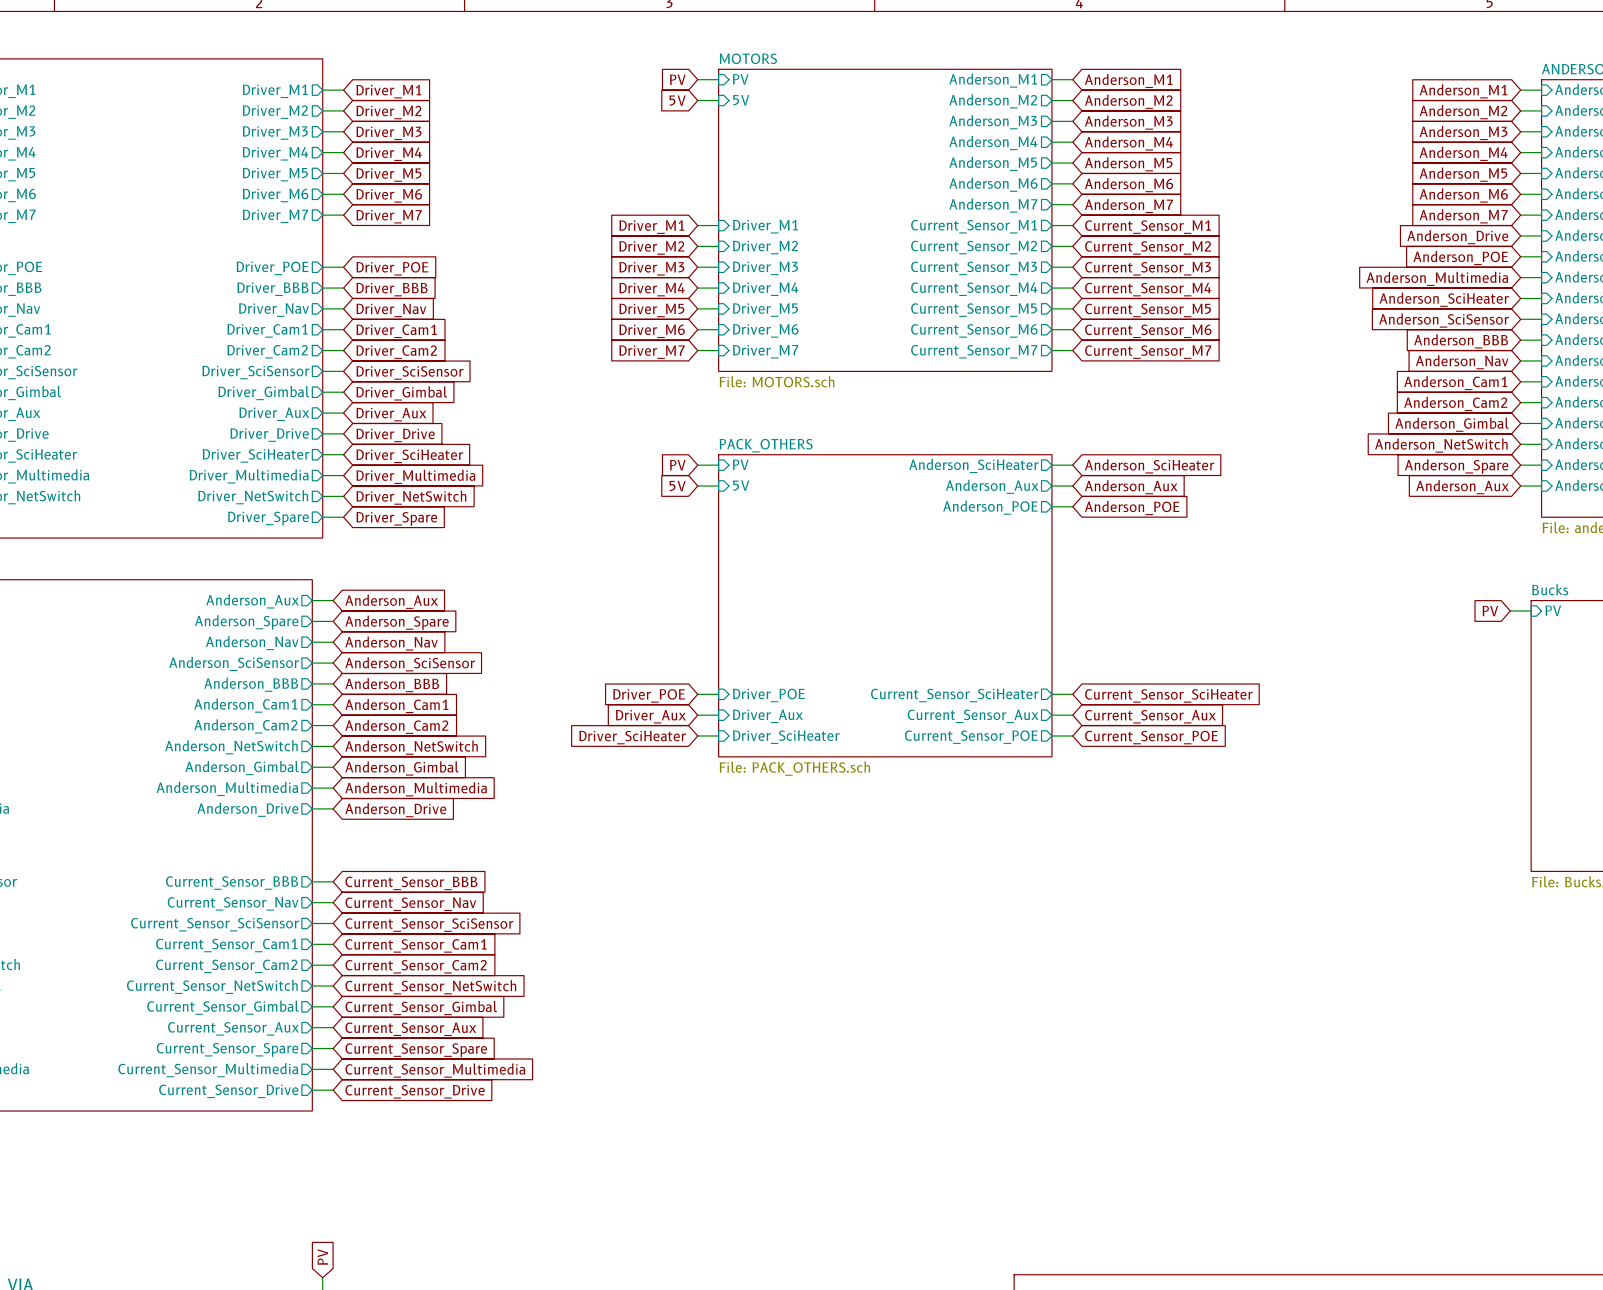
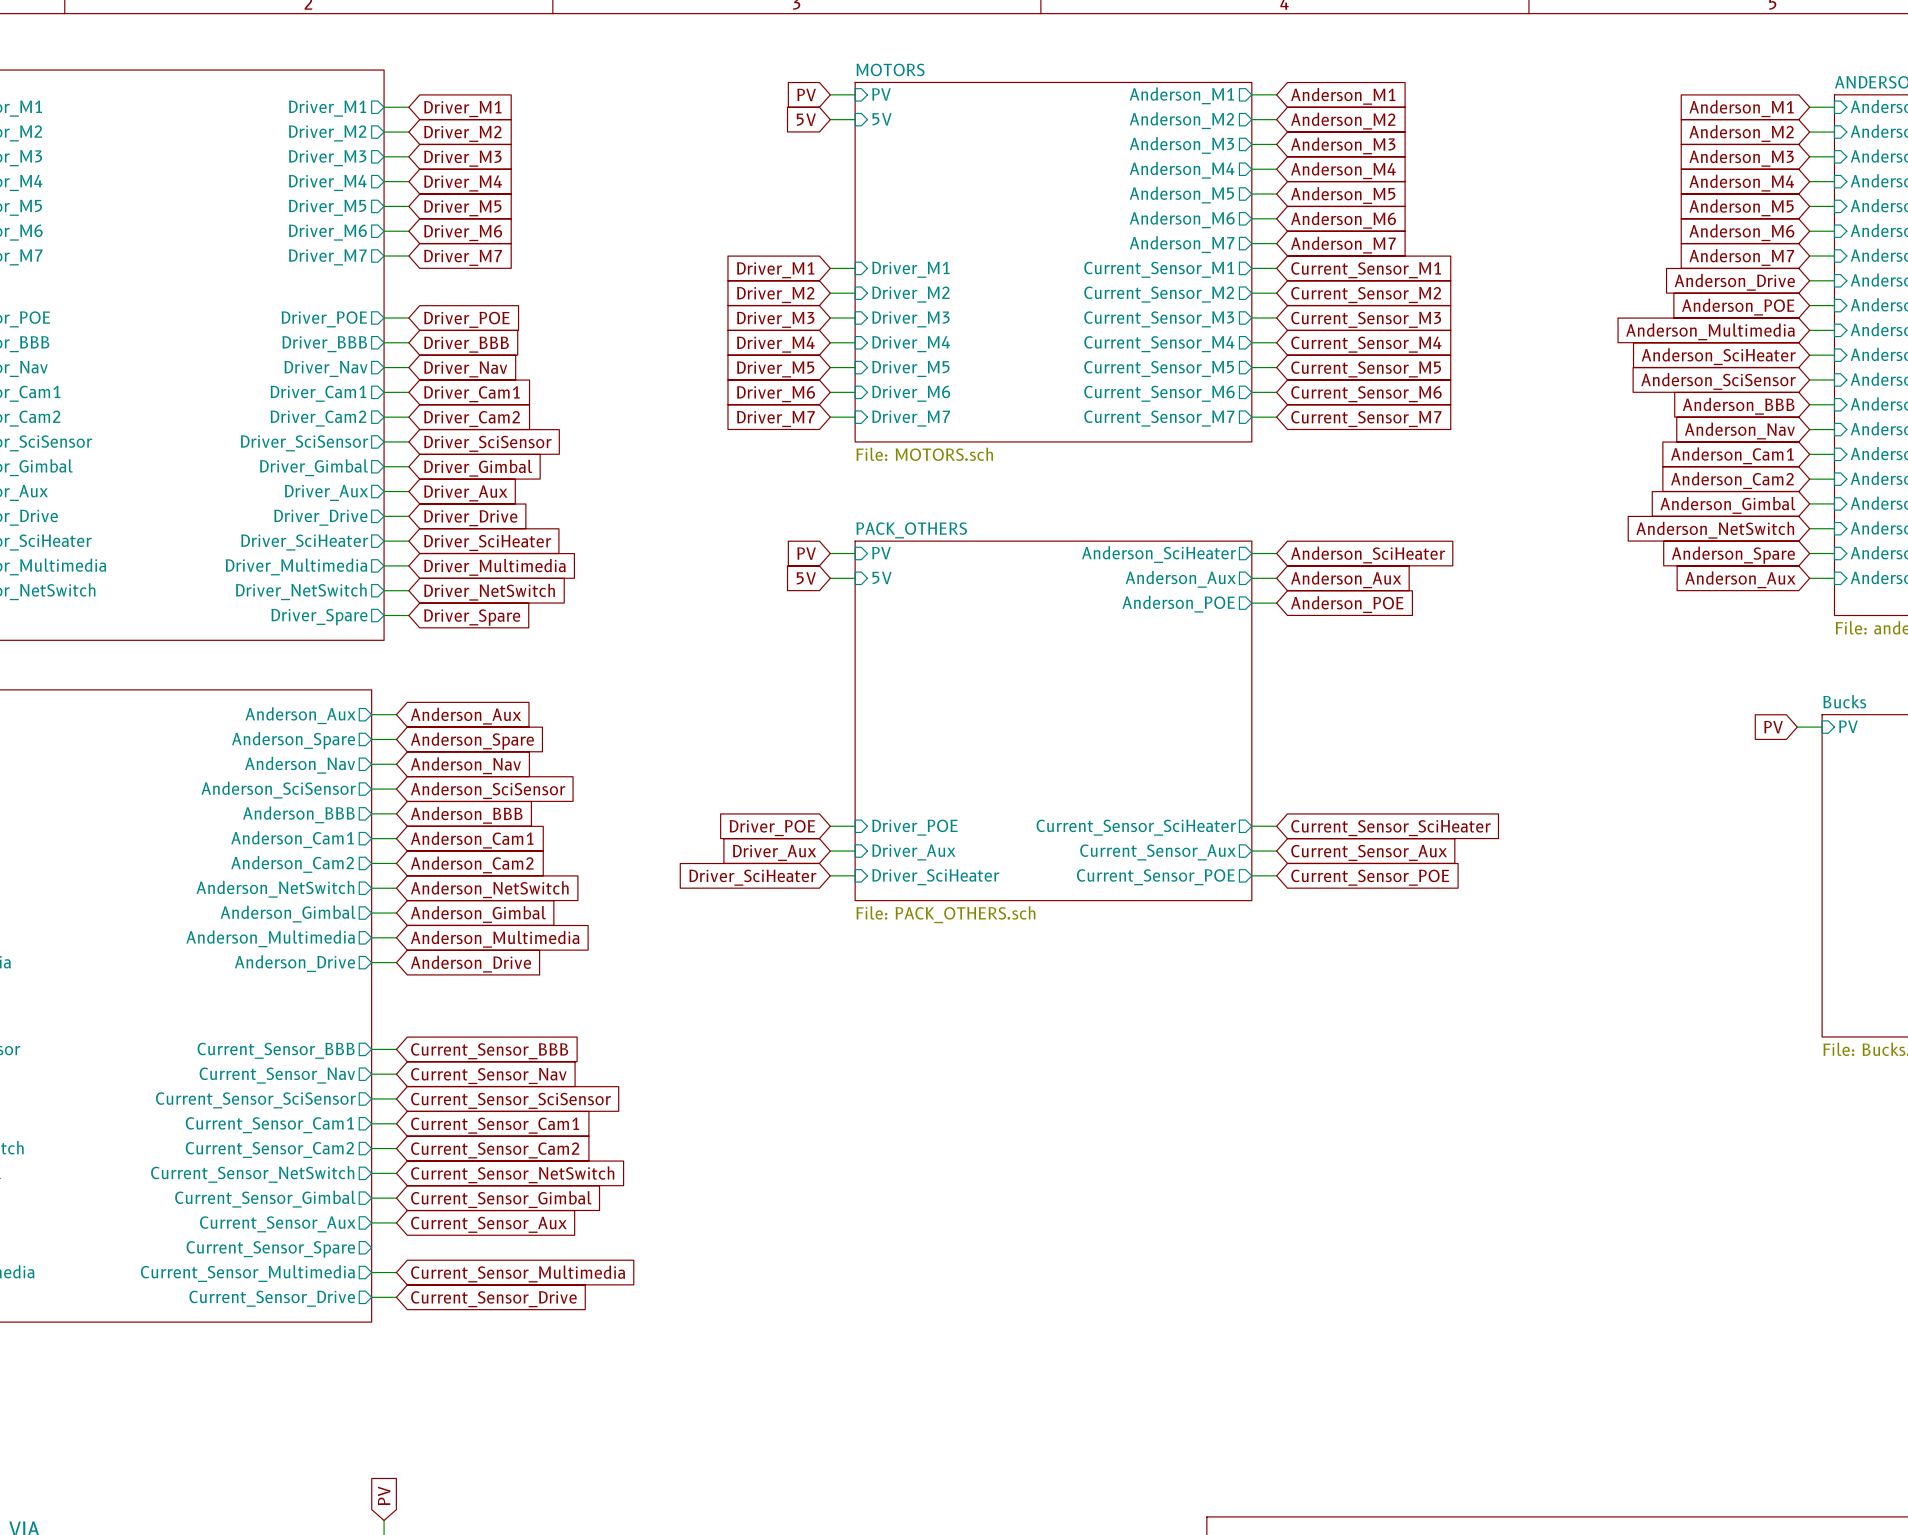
wire: (312, 1048) (333, 1048) -> none
global label: Current_Sensor_Spare (416, 1050) -> none

